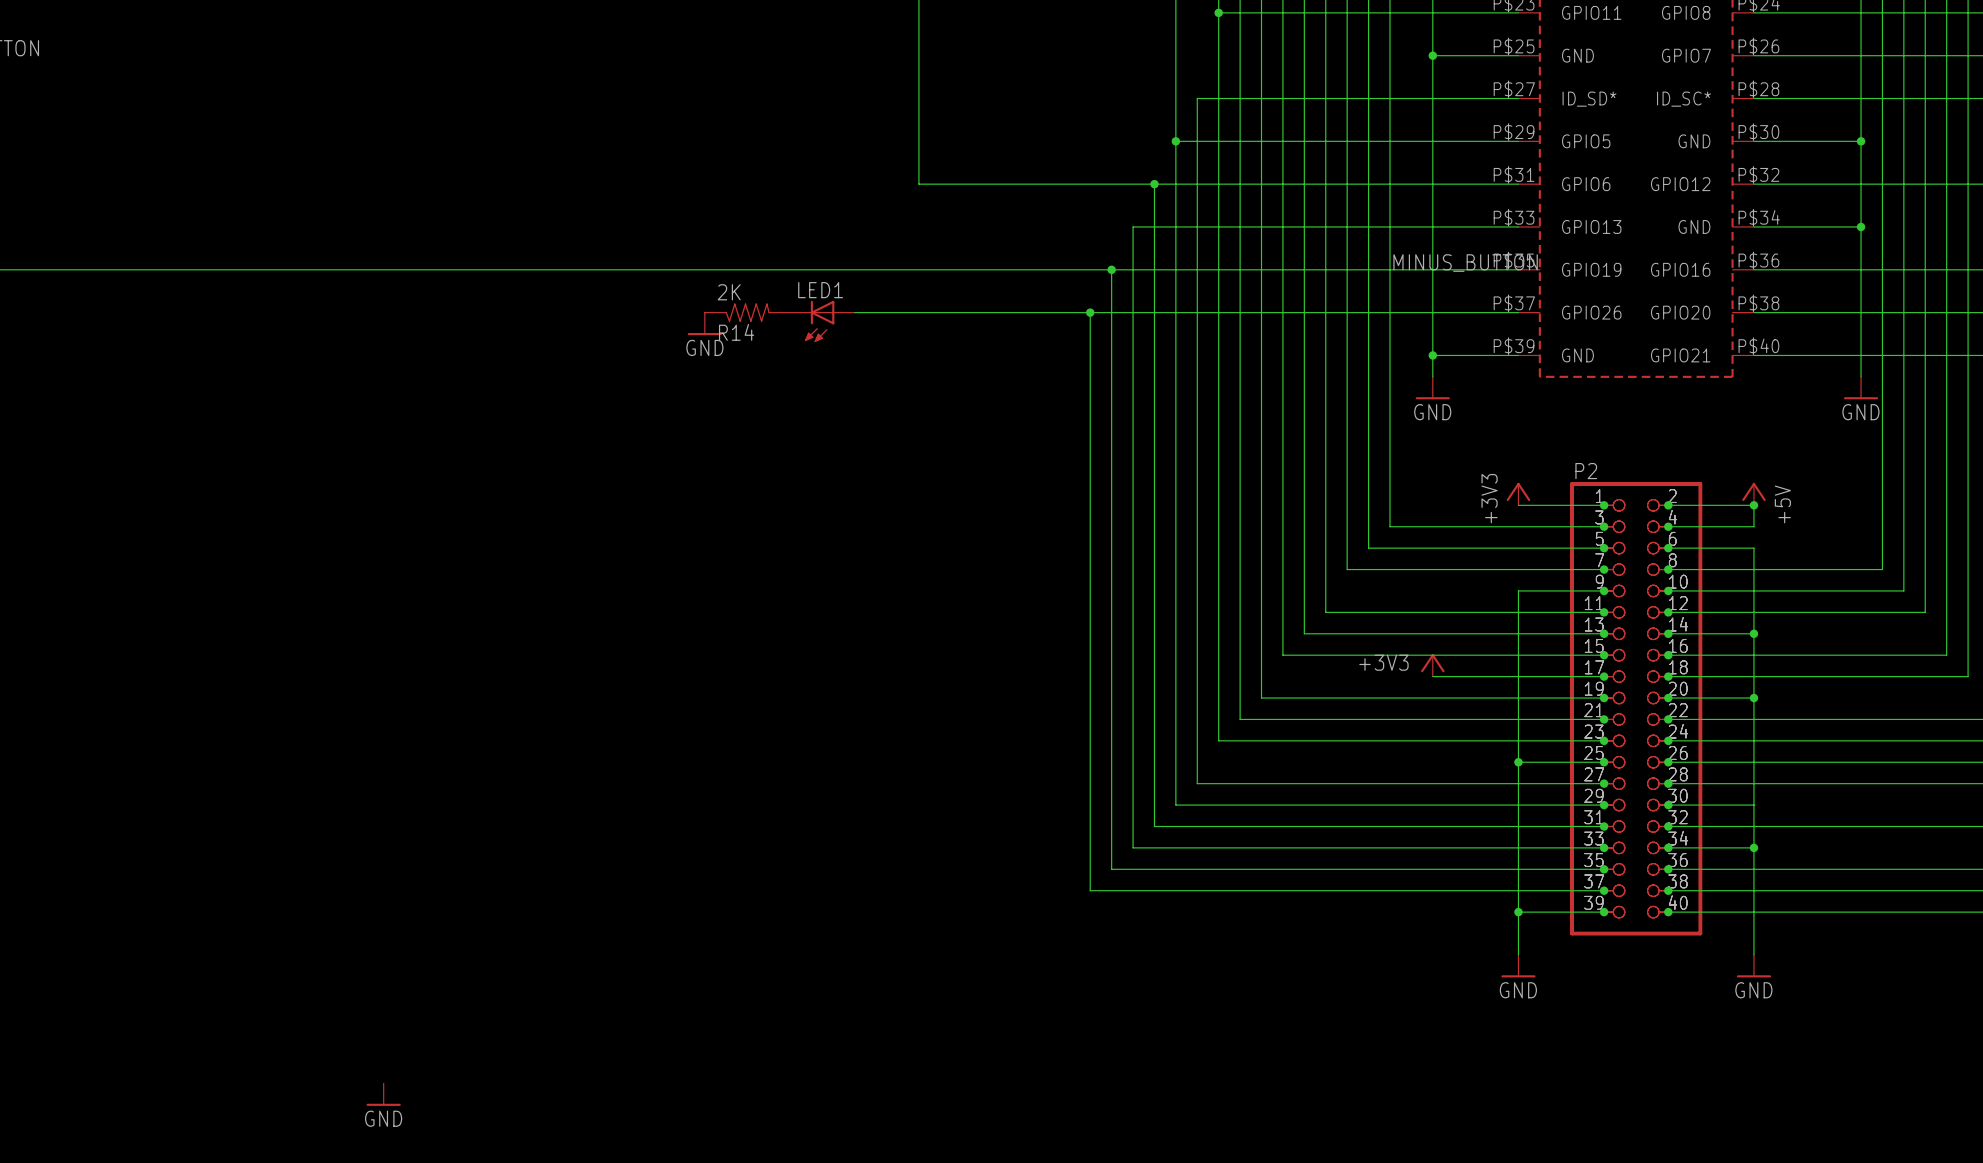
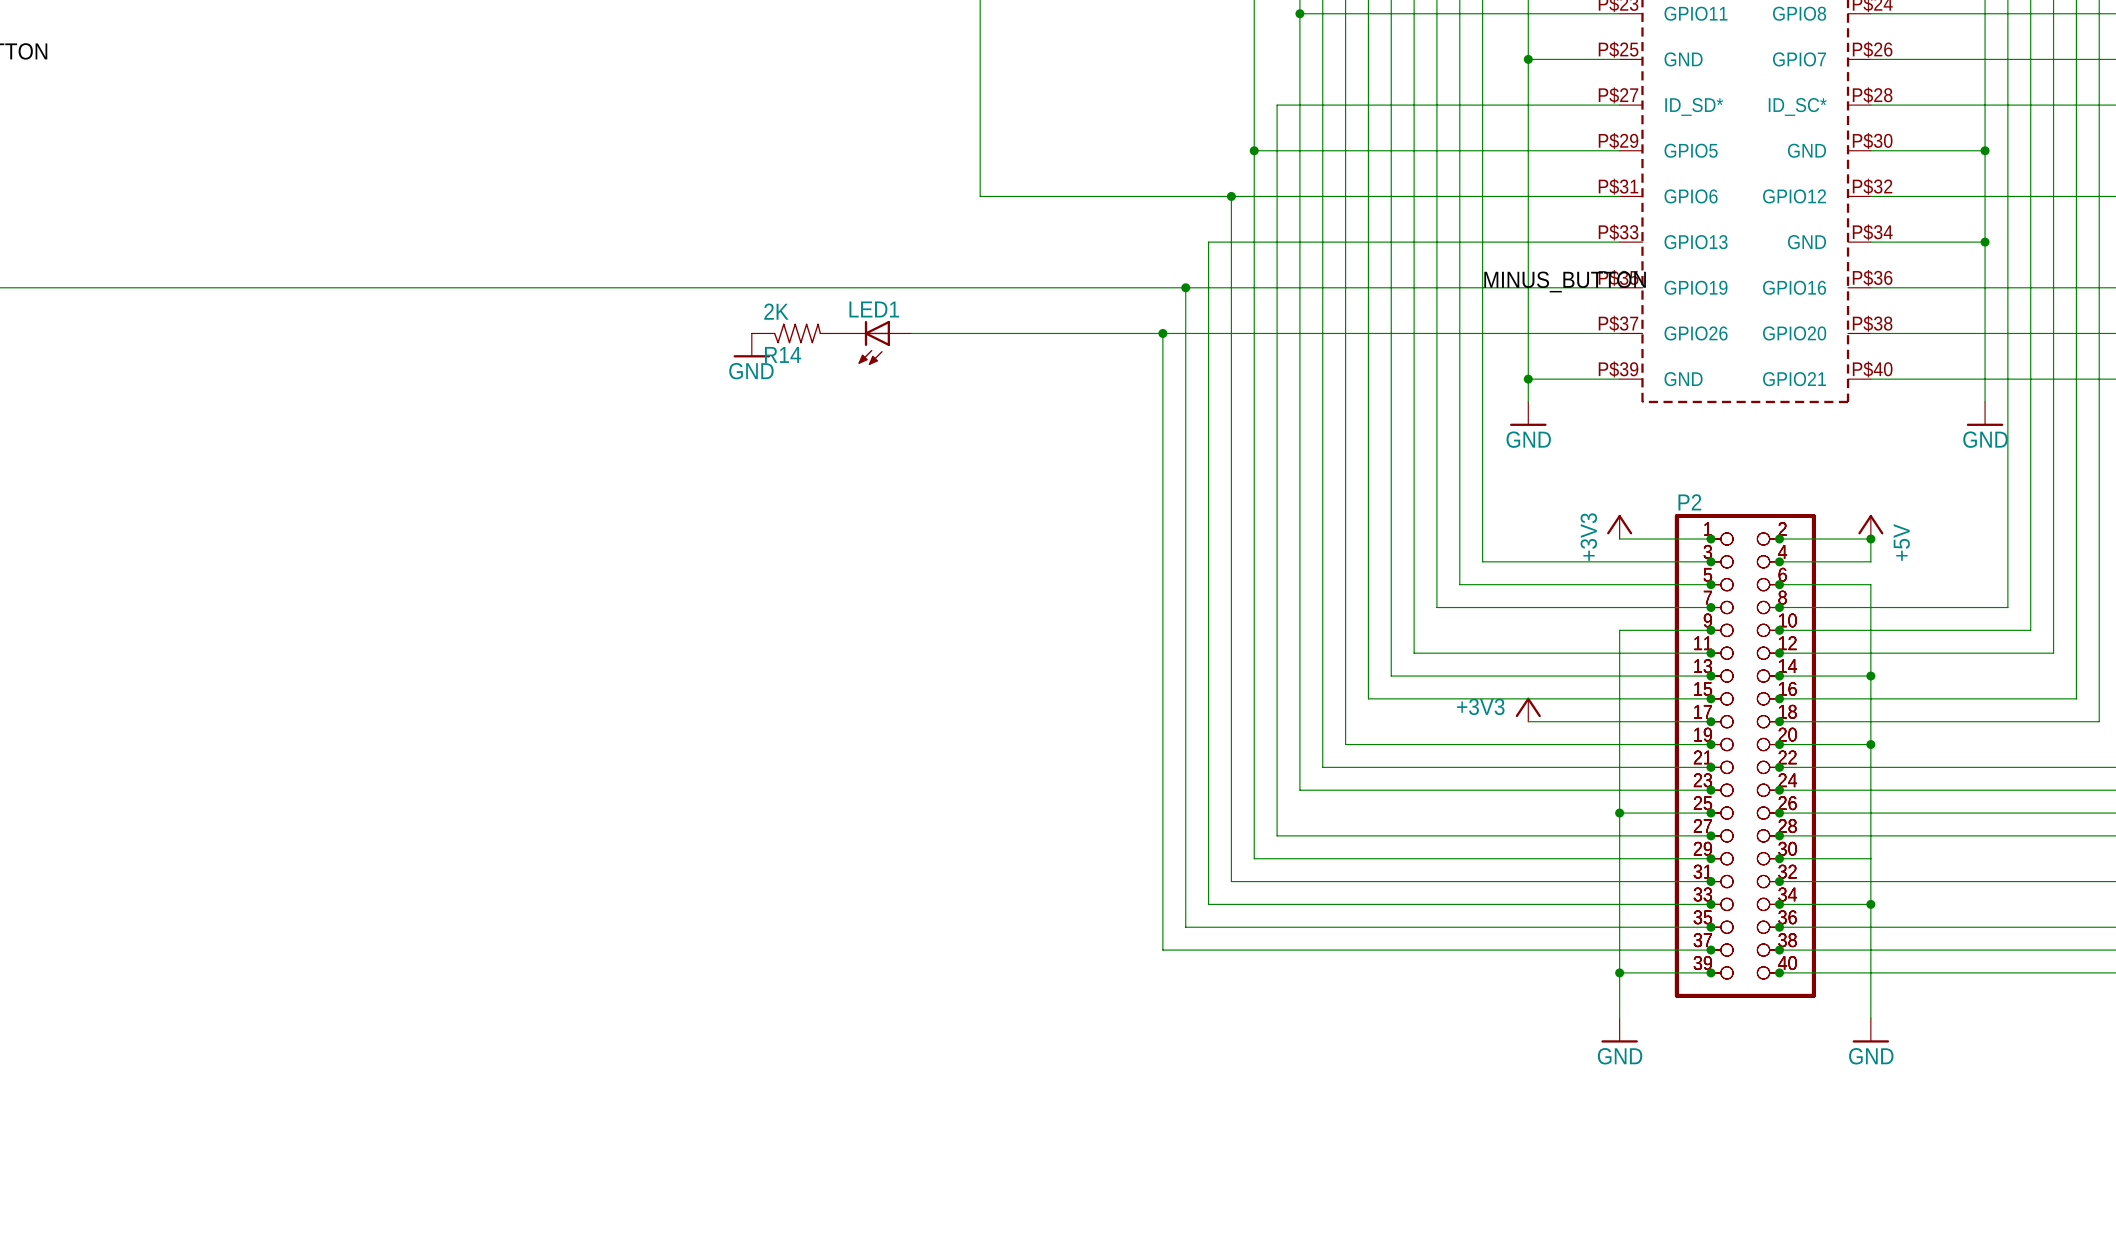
power symbol: GND (383, 1094) -> none

